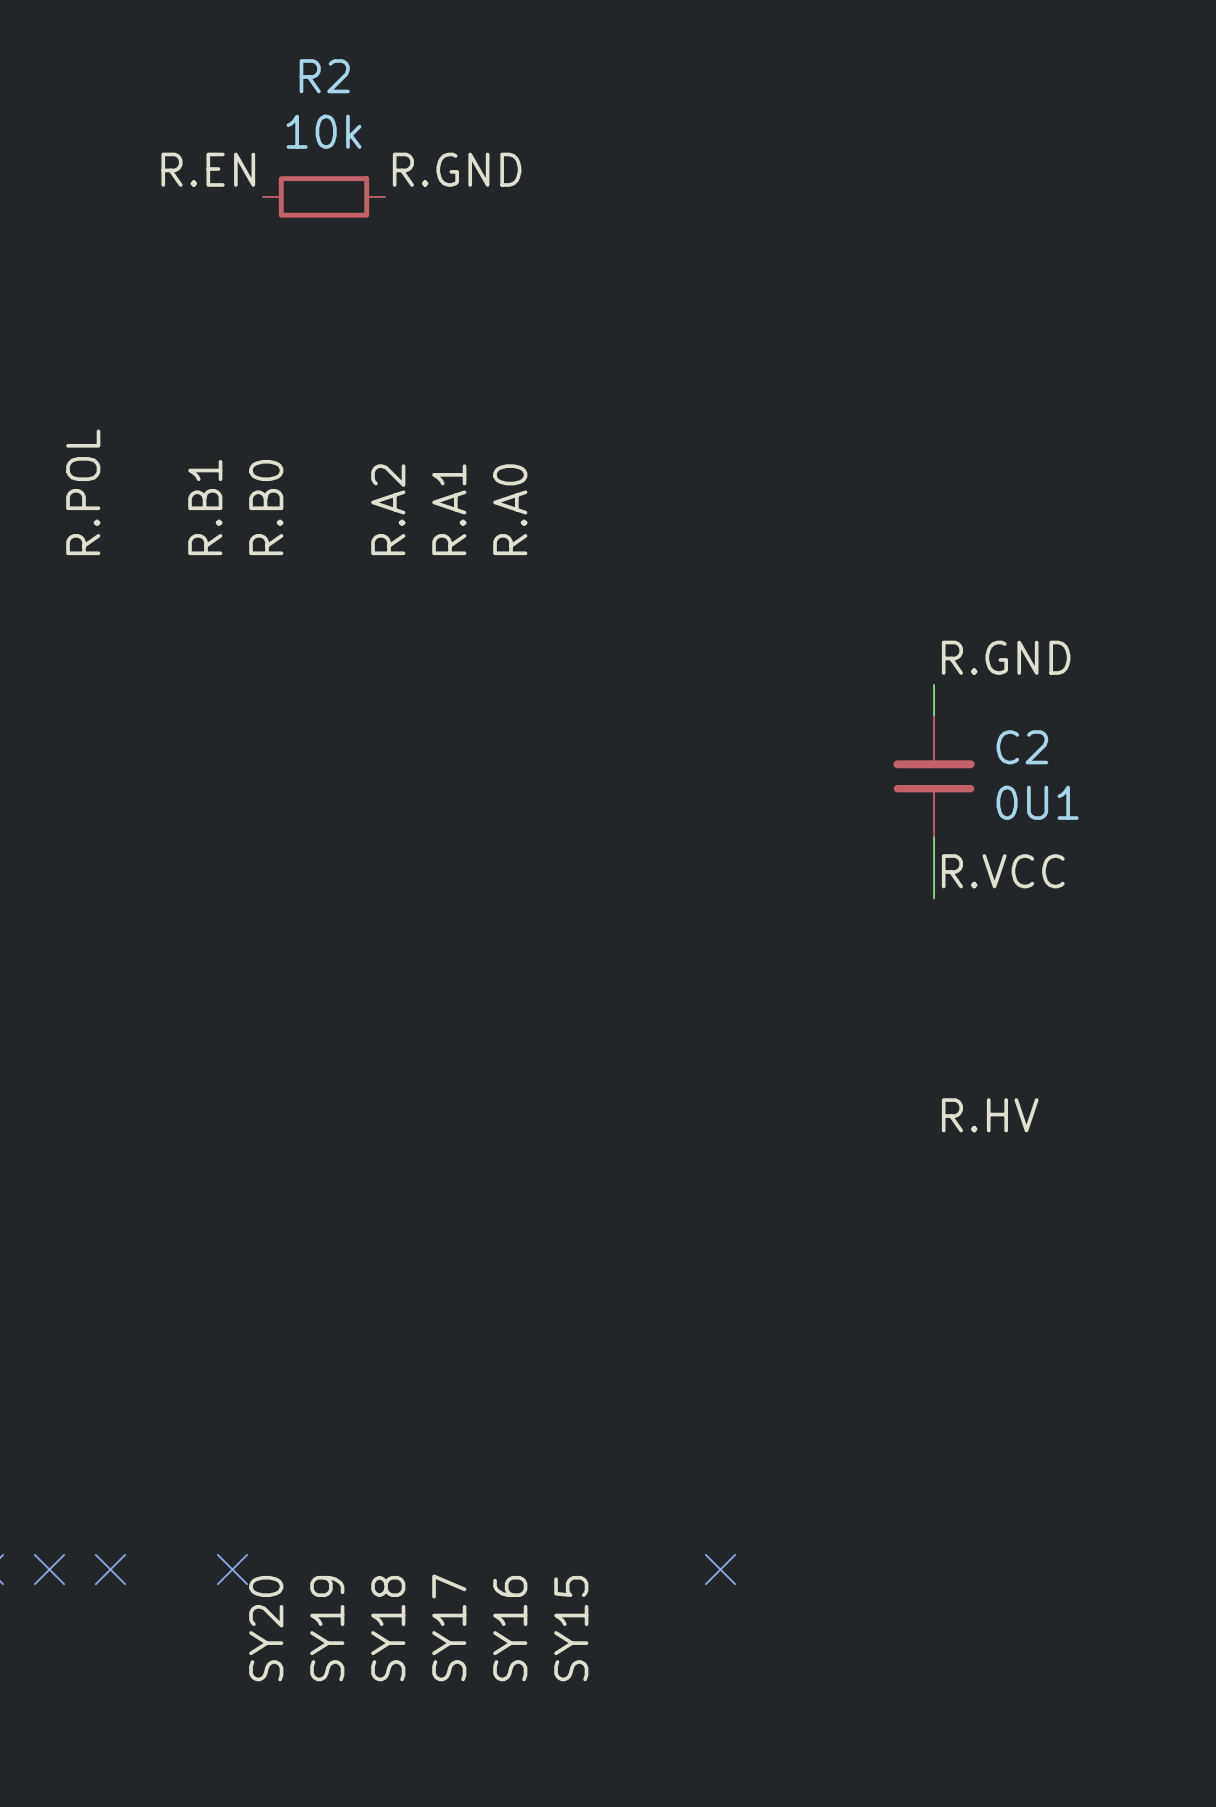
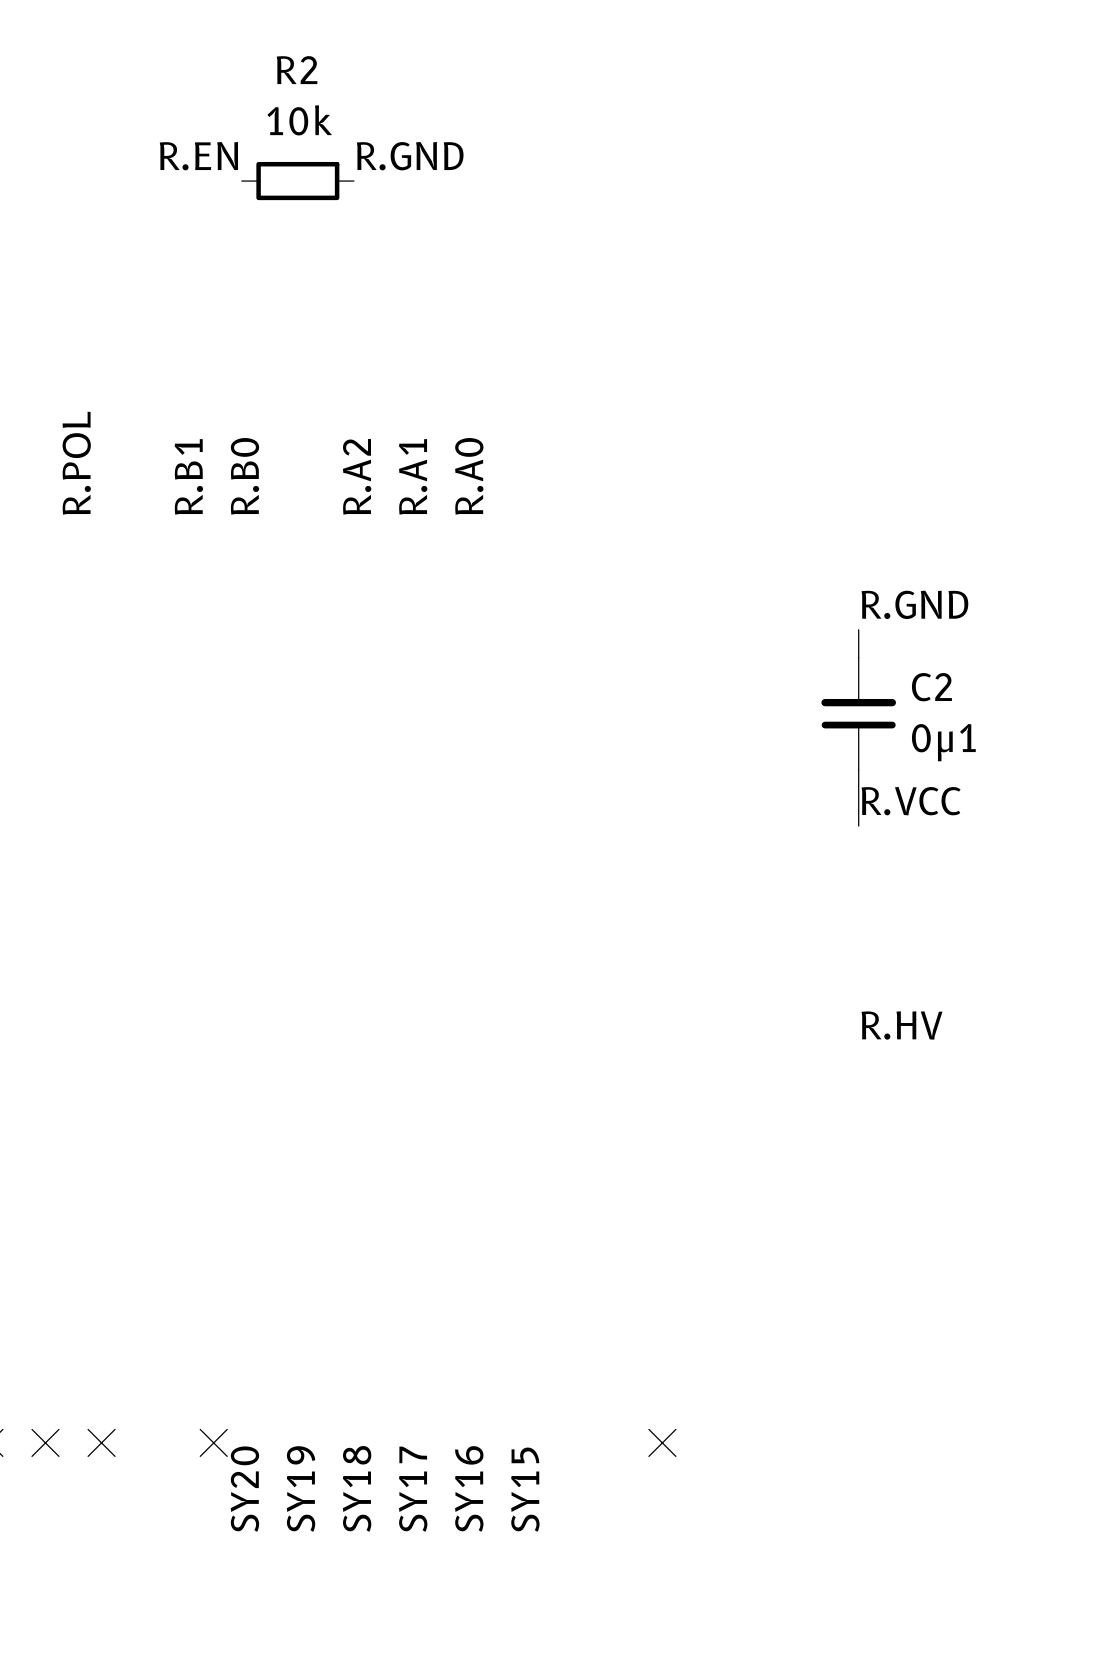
C2 value: 0U1 (1037, 802) -> 0μ1 (943, 742)

